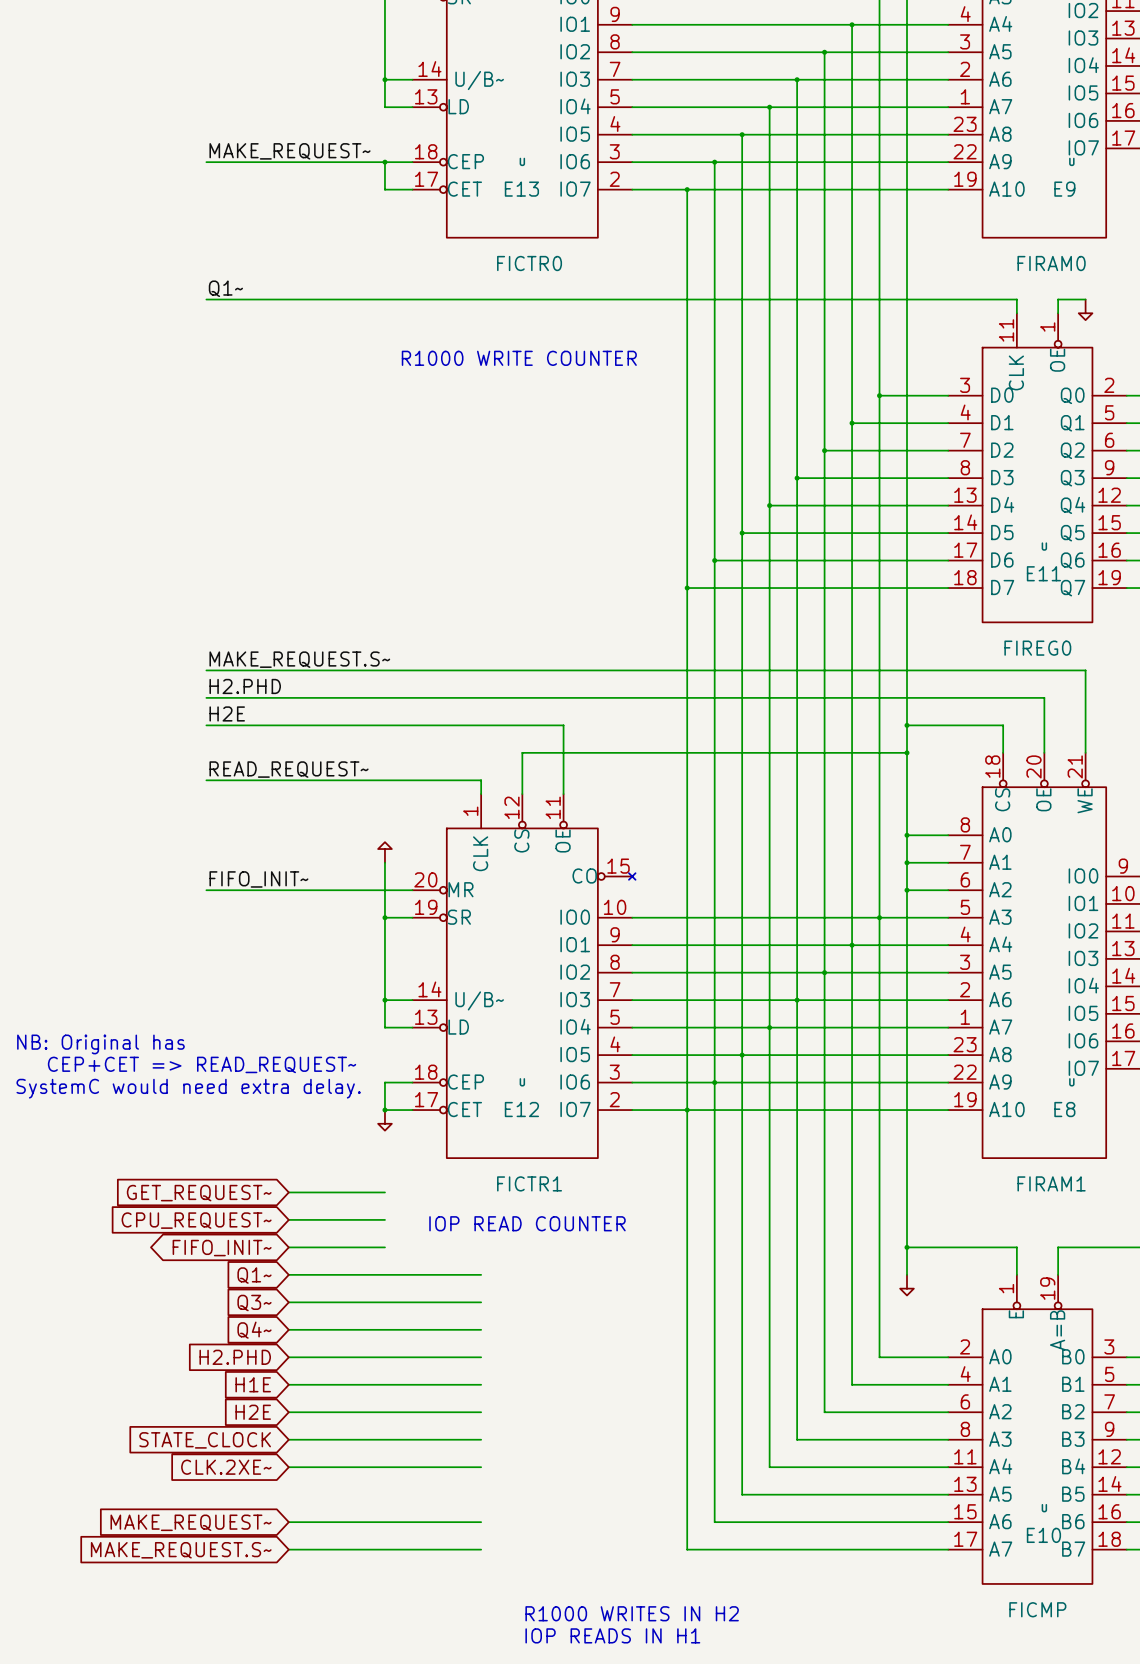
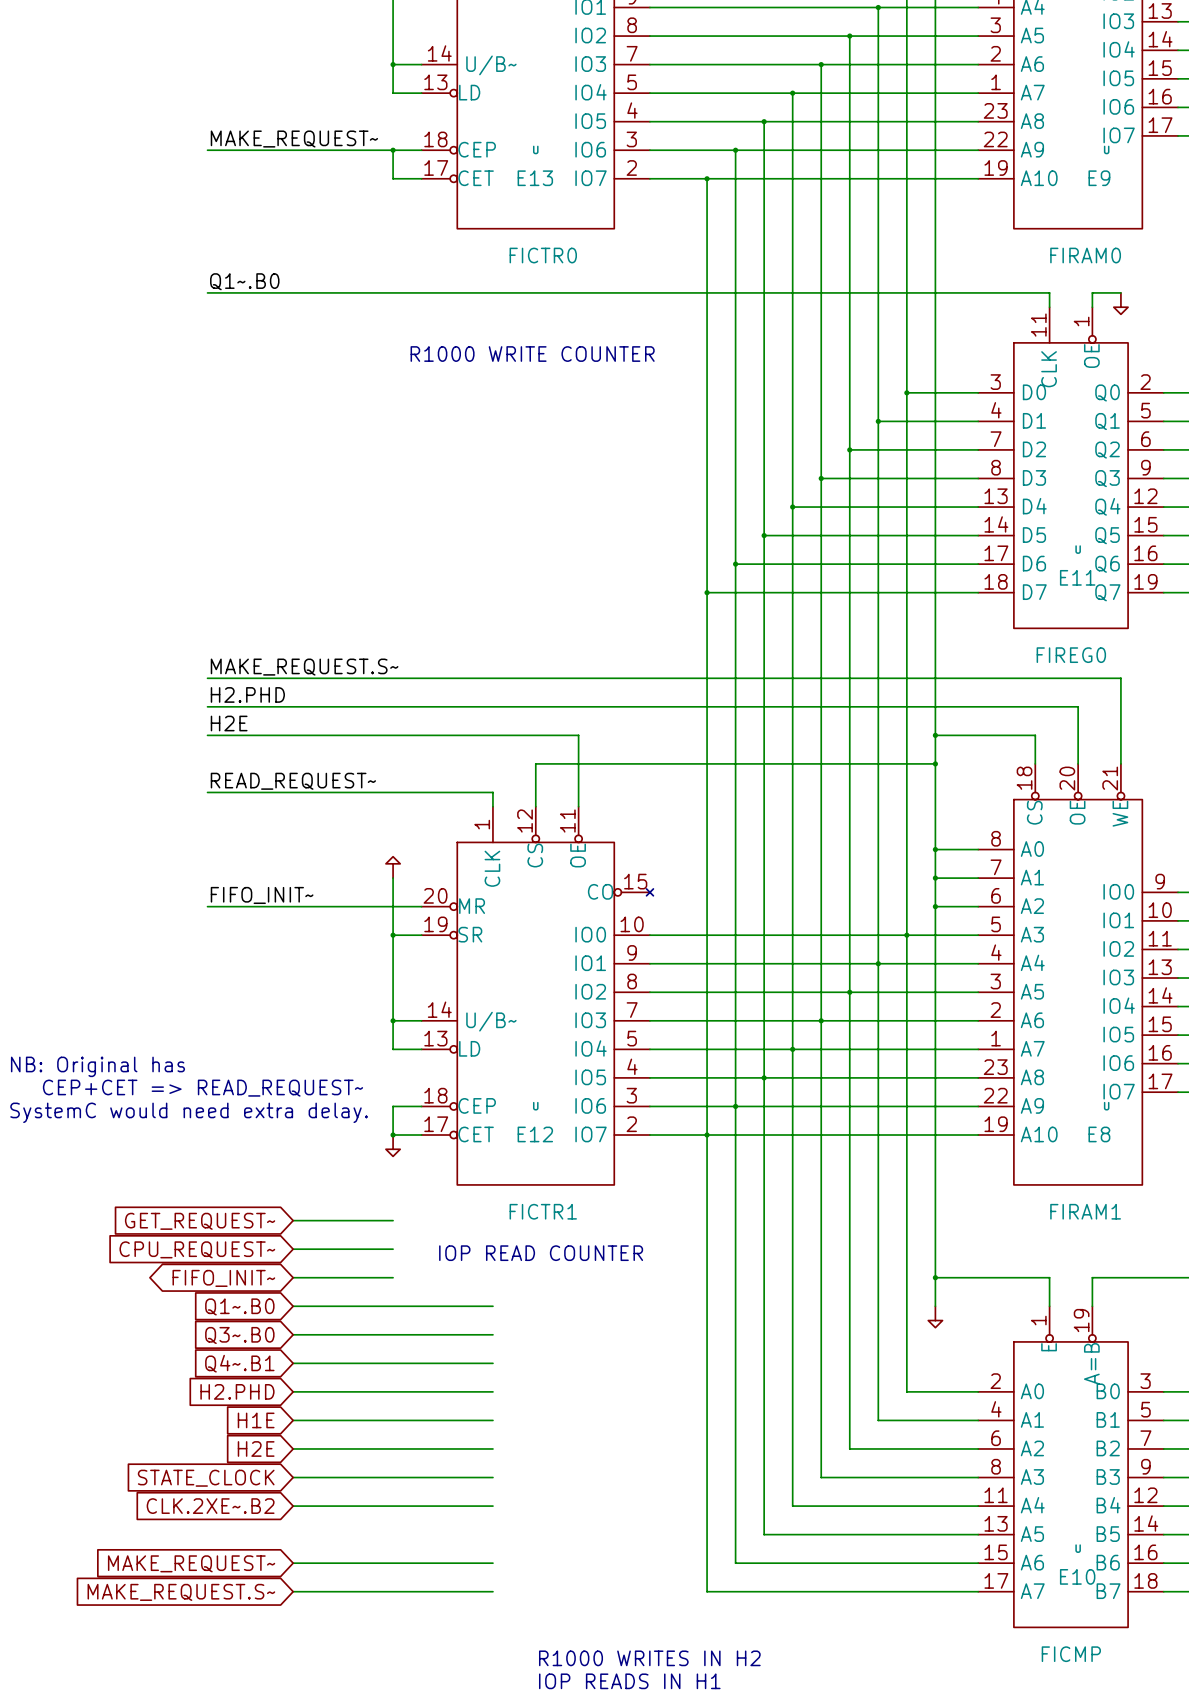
label: Q1~ (225, 288) -> Q1~.B0 (244, 281)
global label: Q1~ (254, 1275) -> Q1~.B0 (239, 1306)
global label: Q3~ (254, 1303) -> Q3~.B0 (239, 1335)
global label: Q4~ (254, 1330) -> Q4~.B1 (239, 1363)
global label: CLK.2XE~ (226, 1467) -> CLK.2XE~.B2 (210, 1506)

